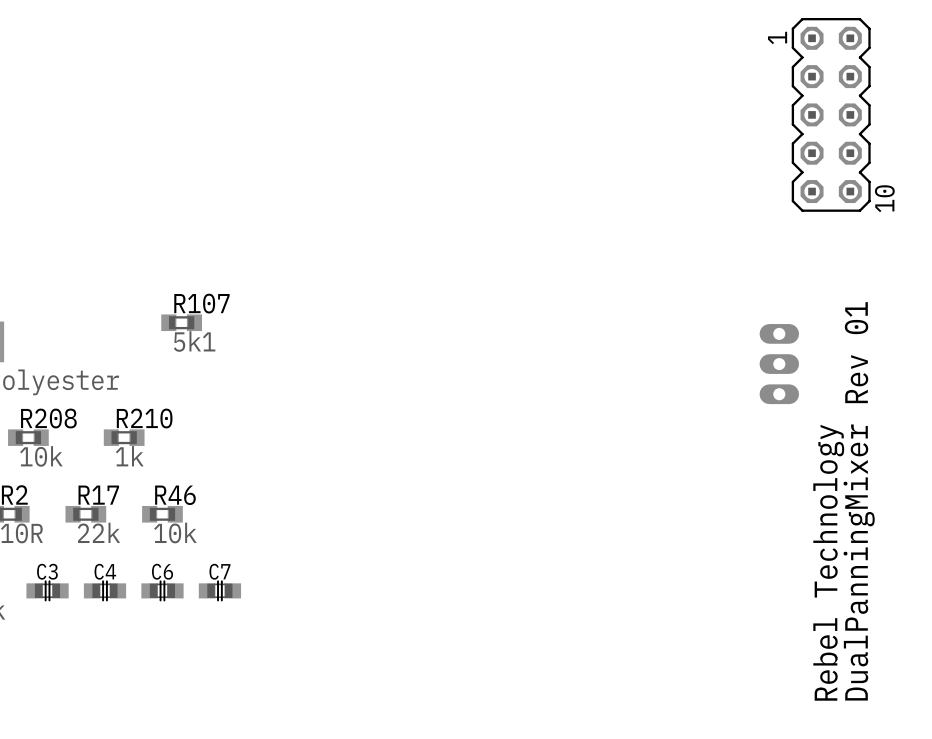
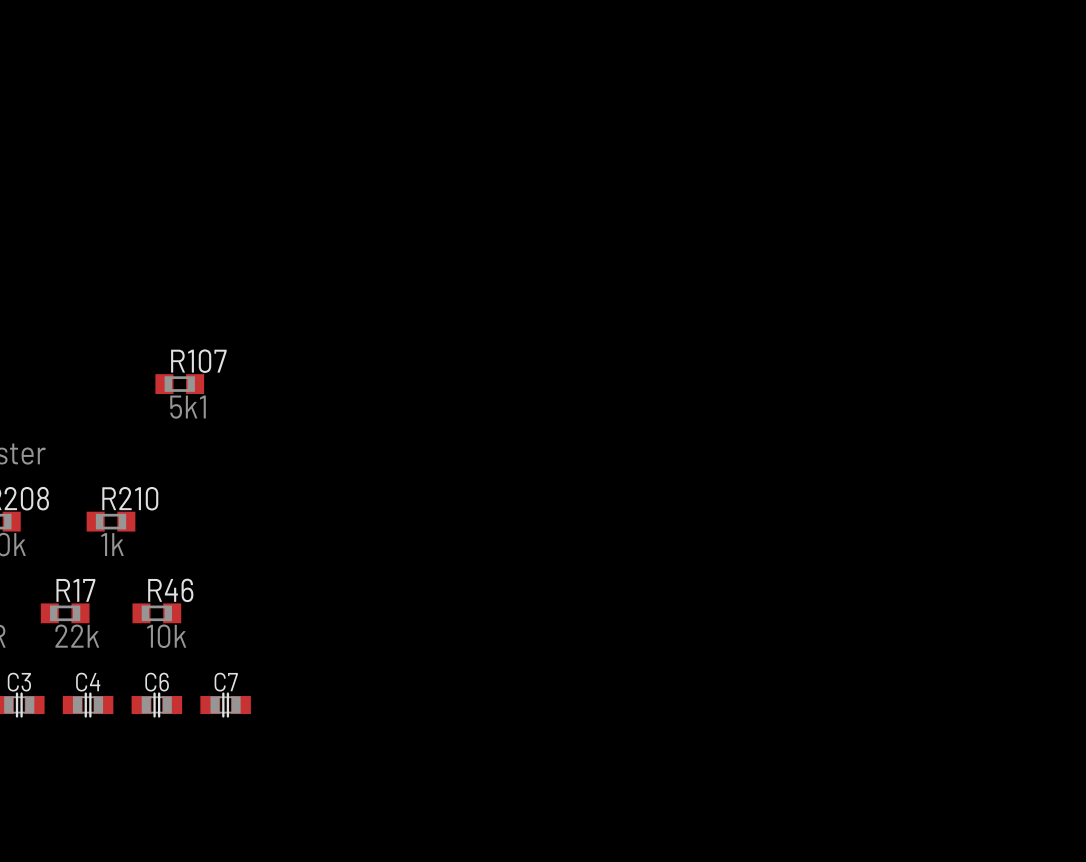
part: (831, 114) -> none
part: (779, 364) -> none
text: DualPanningMixer Rev 01 (859, 501) -> none
text: Rebel Technology (828, 562) -> none

